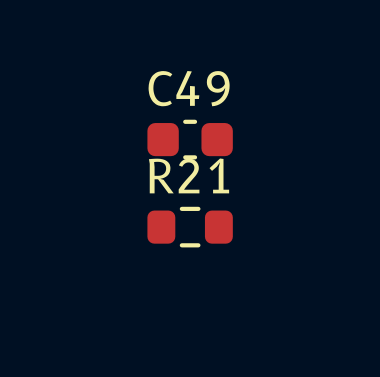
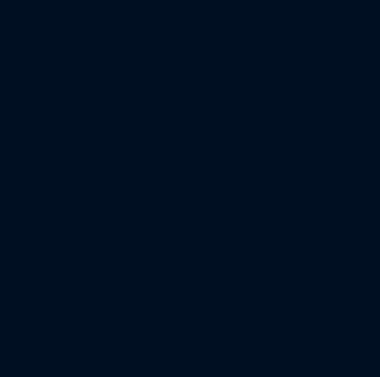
C49: (190, 139) -> none
R21: (190, 227) -> none

